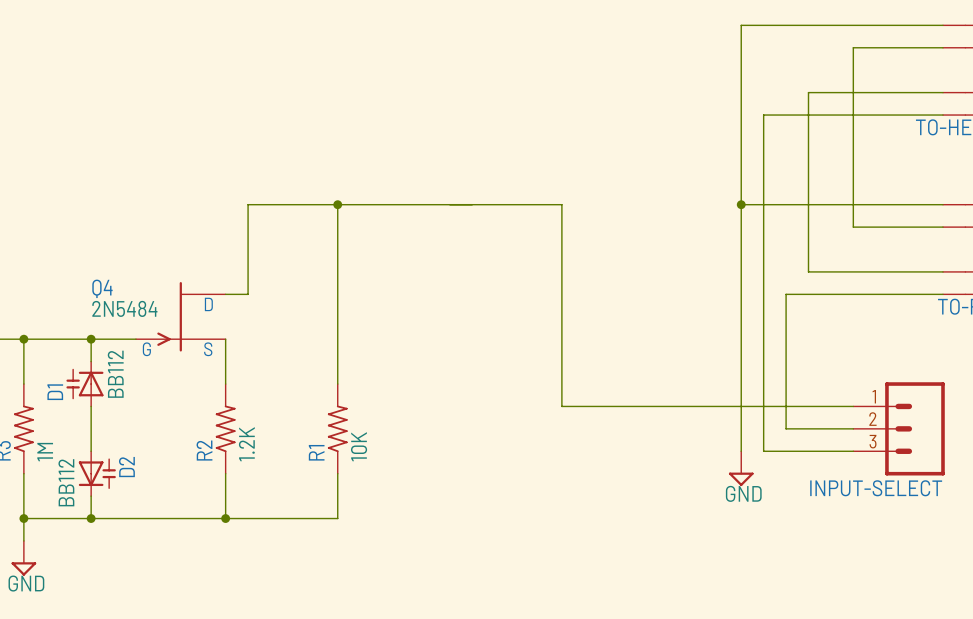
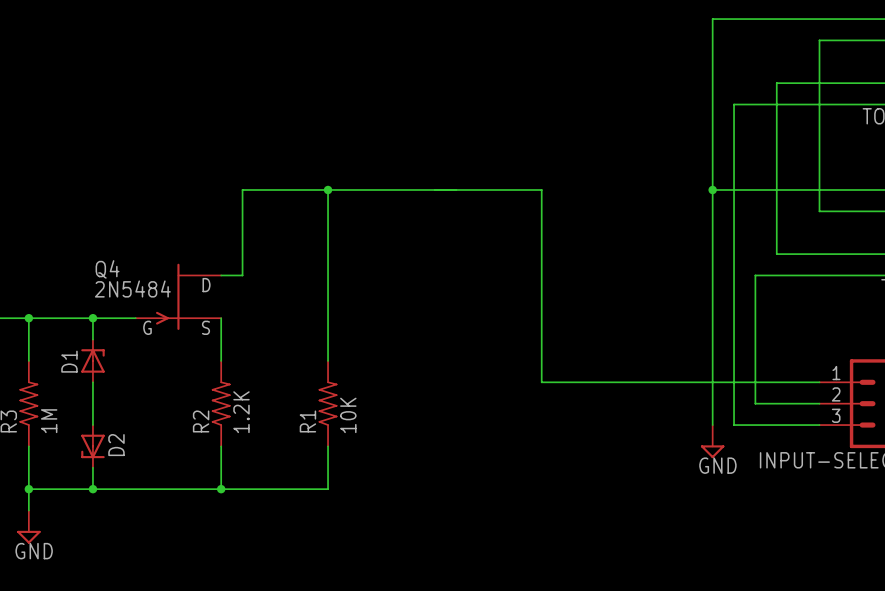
D1 symbol: [66, 361, 104, 407] -> [81, 339, 105, 383]
D1 value: BB112 (115, 374) -> none
D2 symbol: [78, 451, 116, 497] -> [81, 425, 105, 468]
D2 value: BB112 (66, 482) -> none

